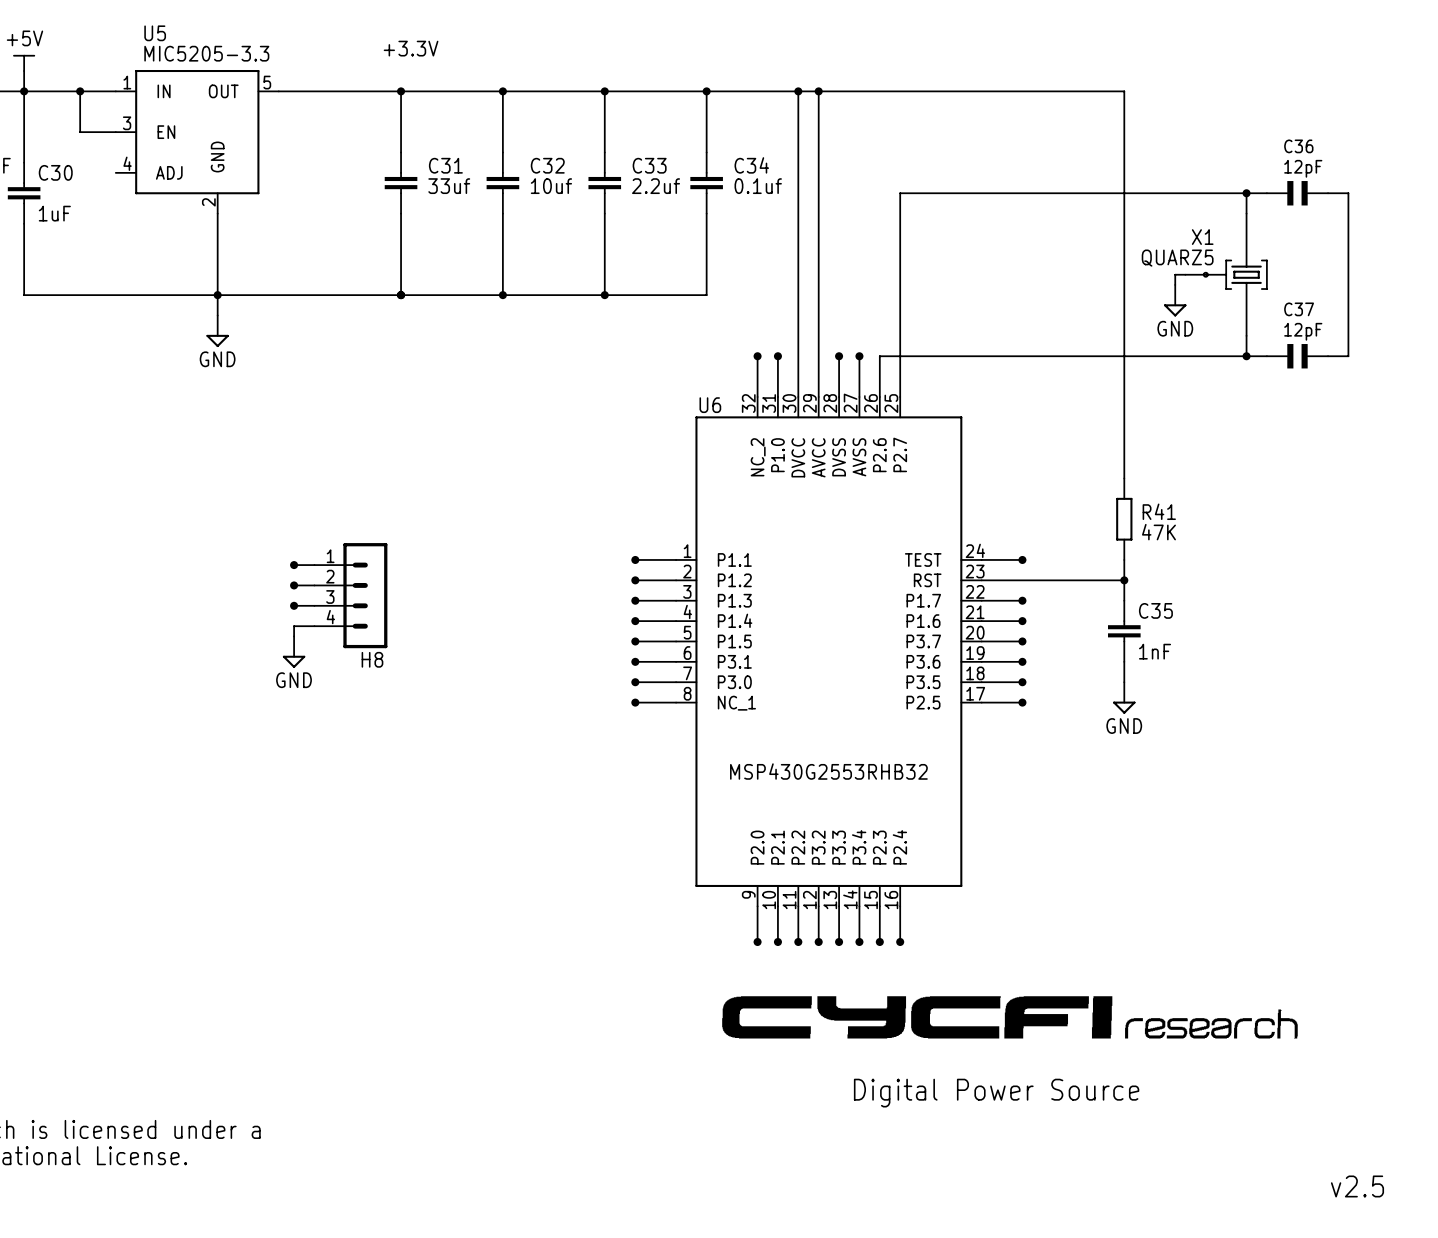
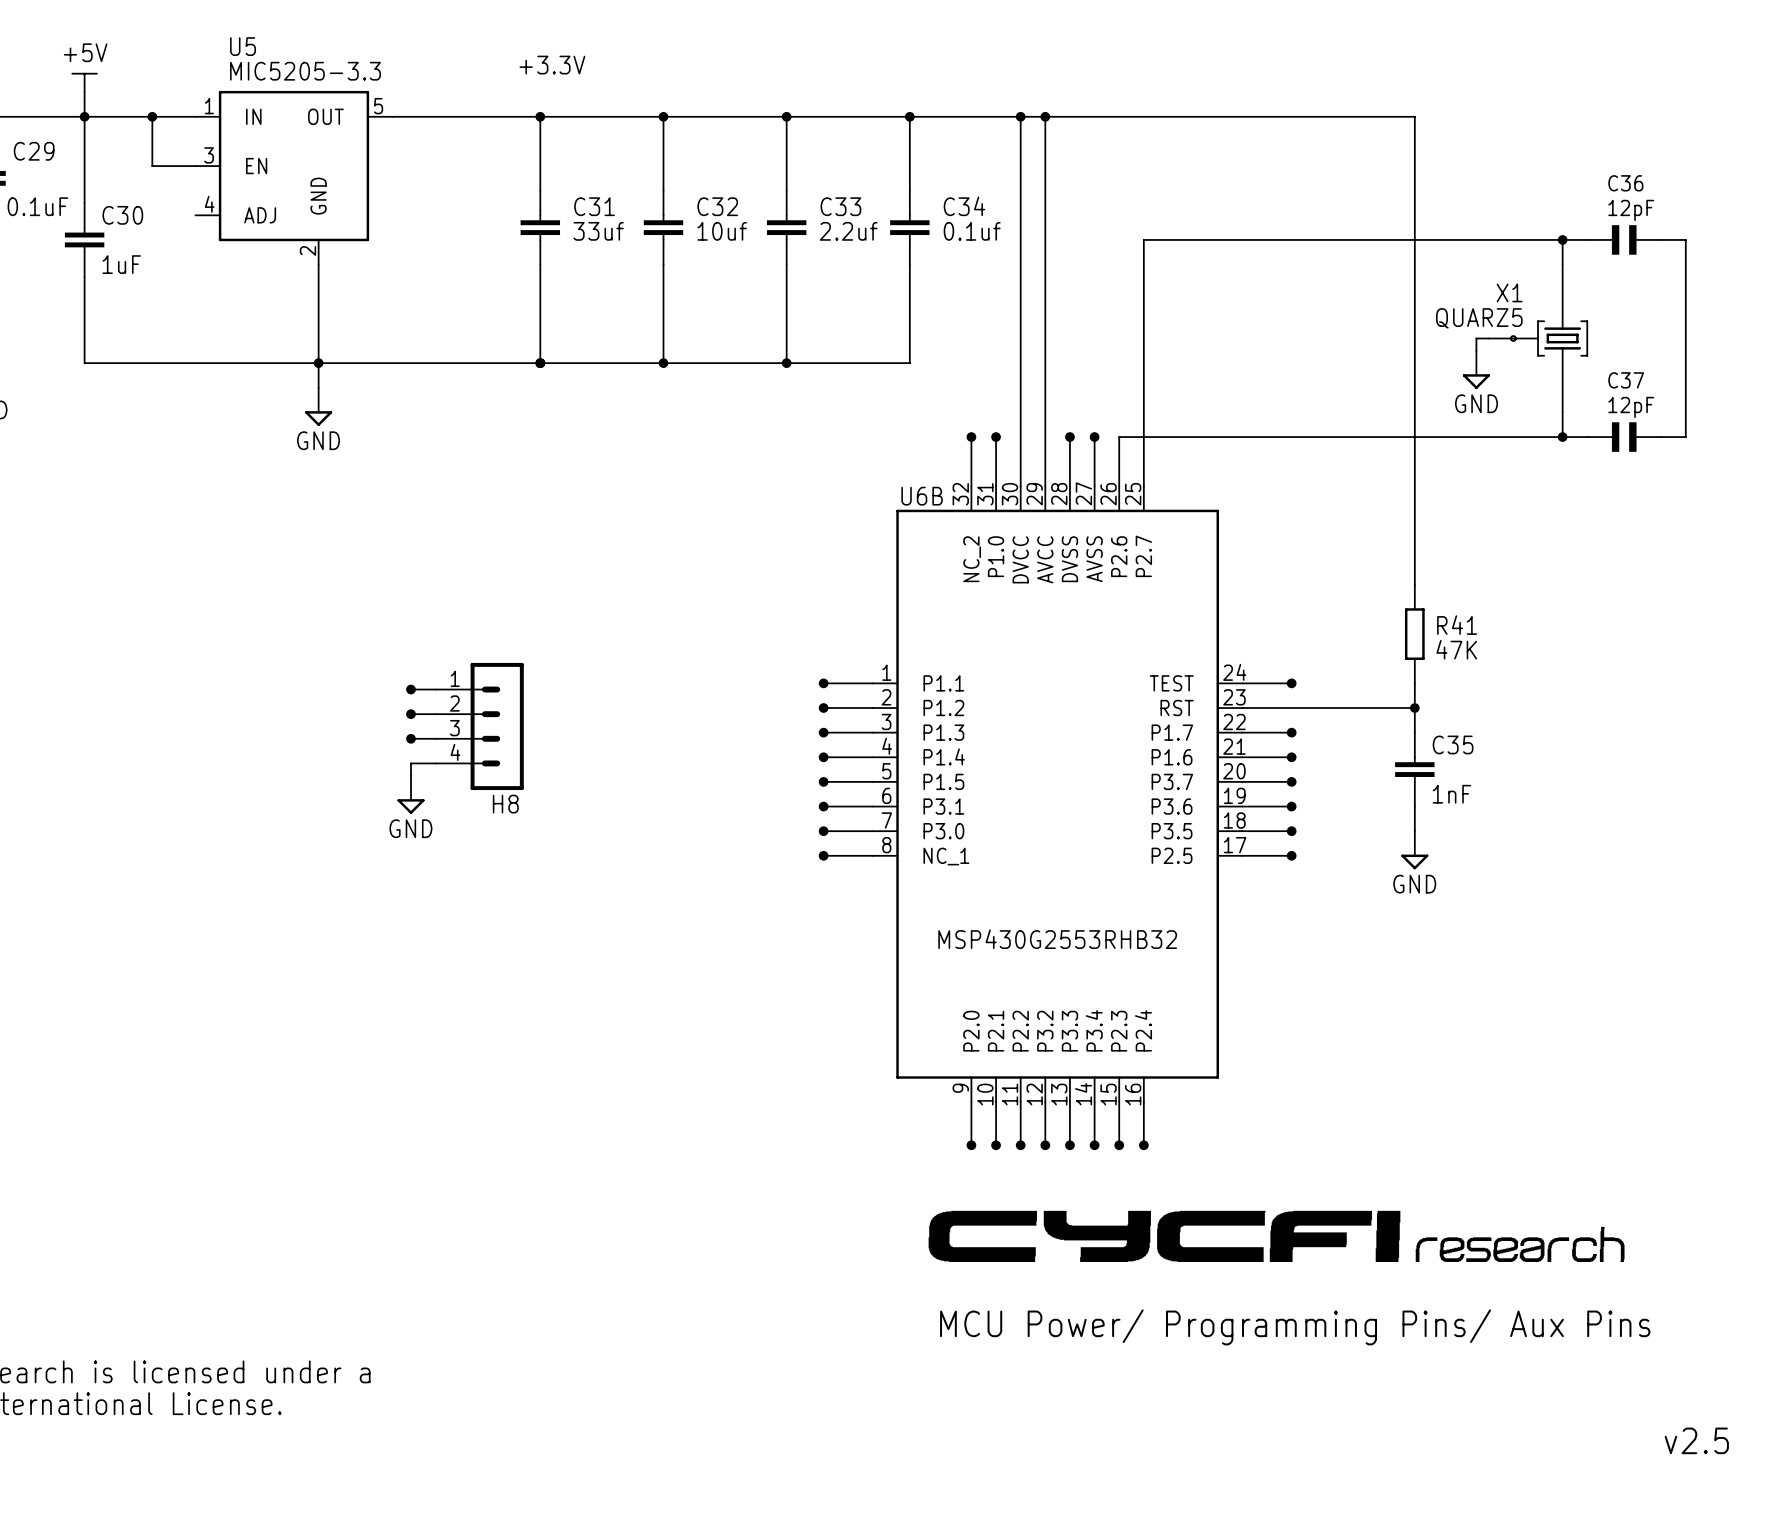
U6 name: U6 (710, 405) -> U6B (922, 496)
text: none -> MCU Power/ Programming Pins/ Aux Pins (1295, 1327)
text: Digital Power Source (996, 1093) -> none

